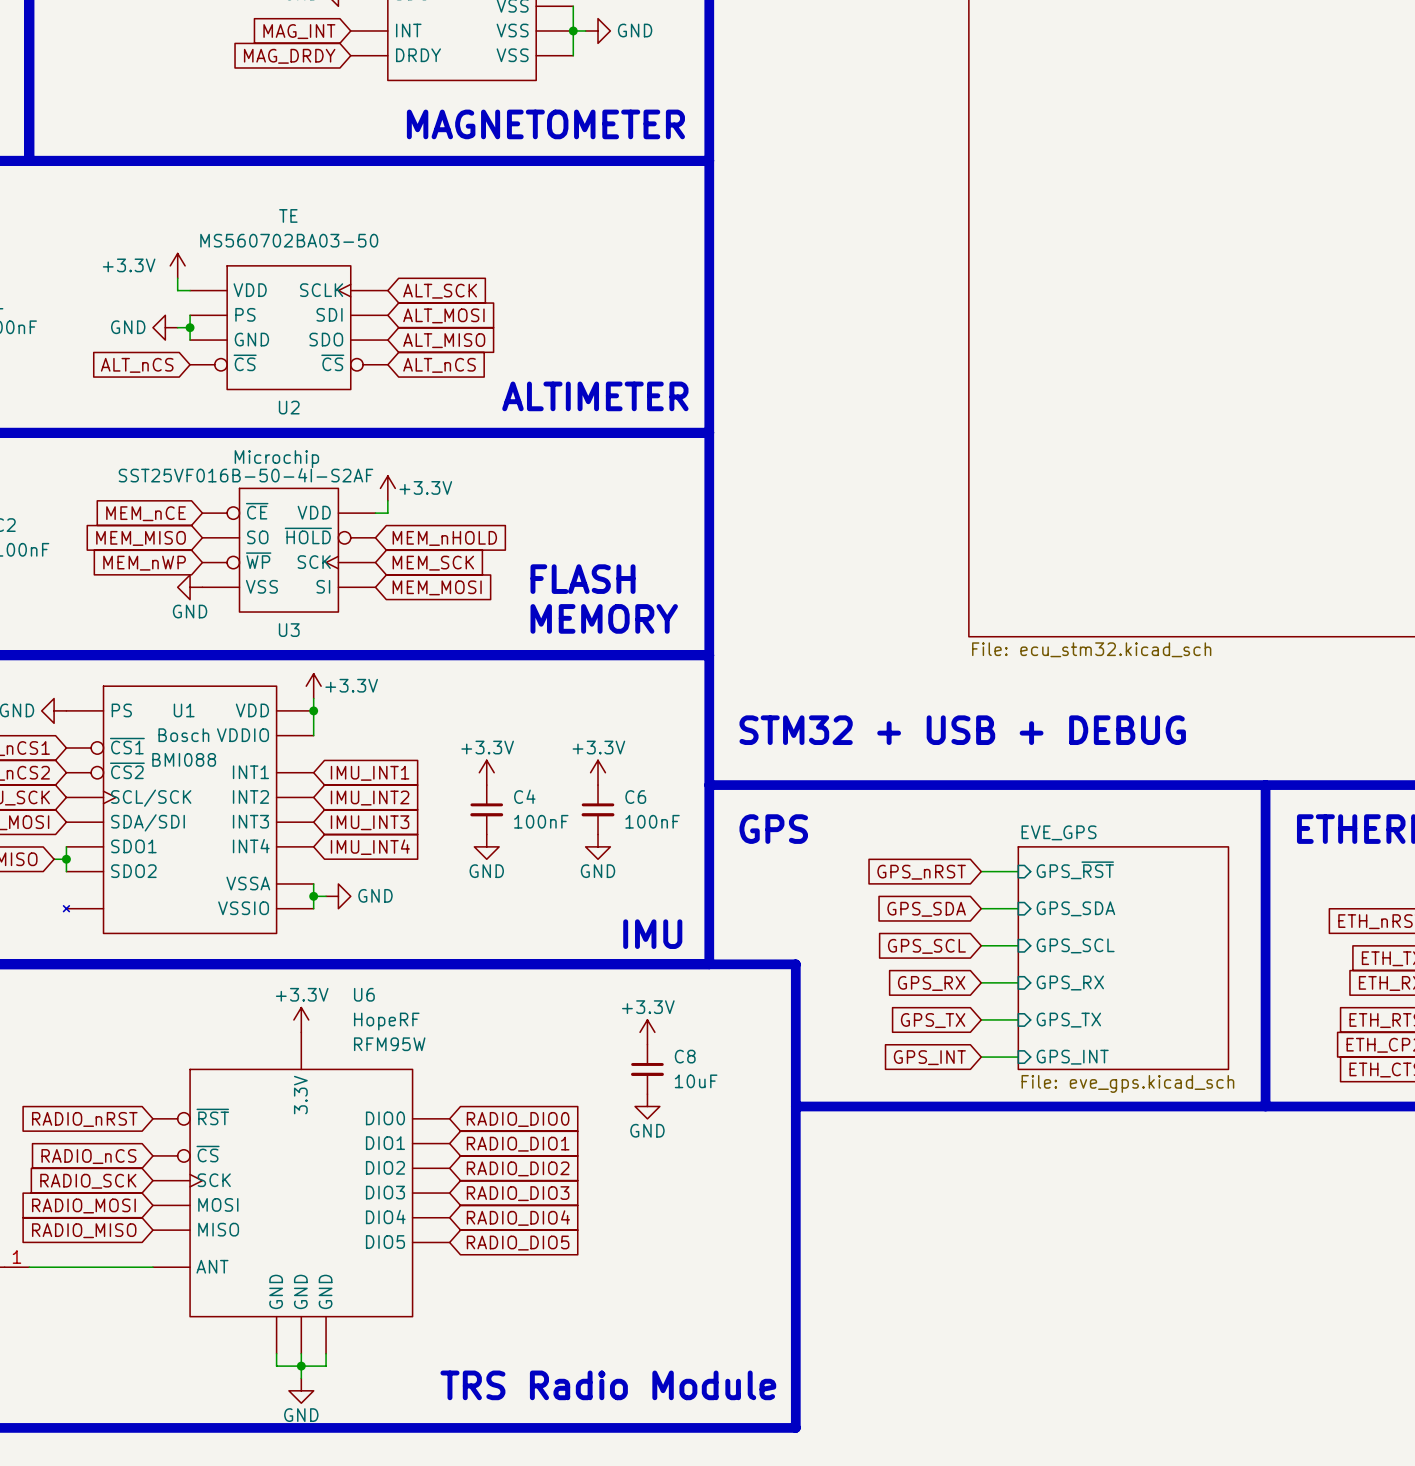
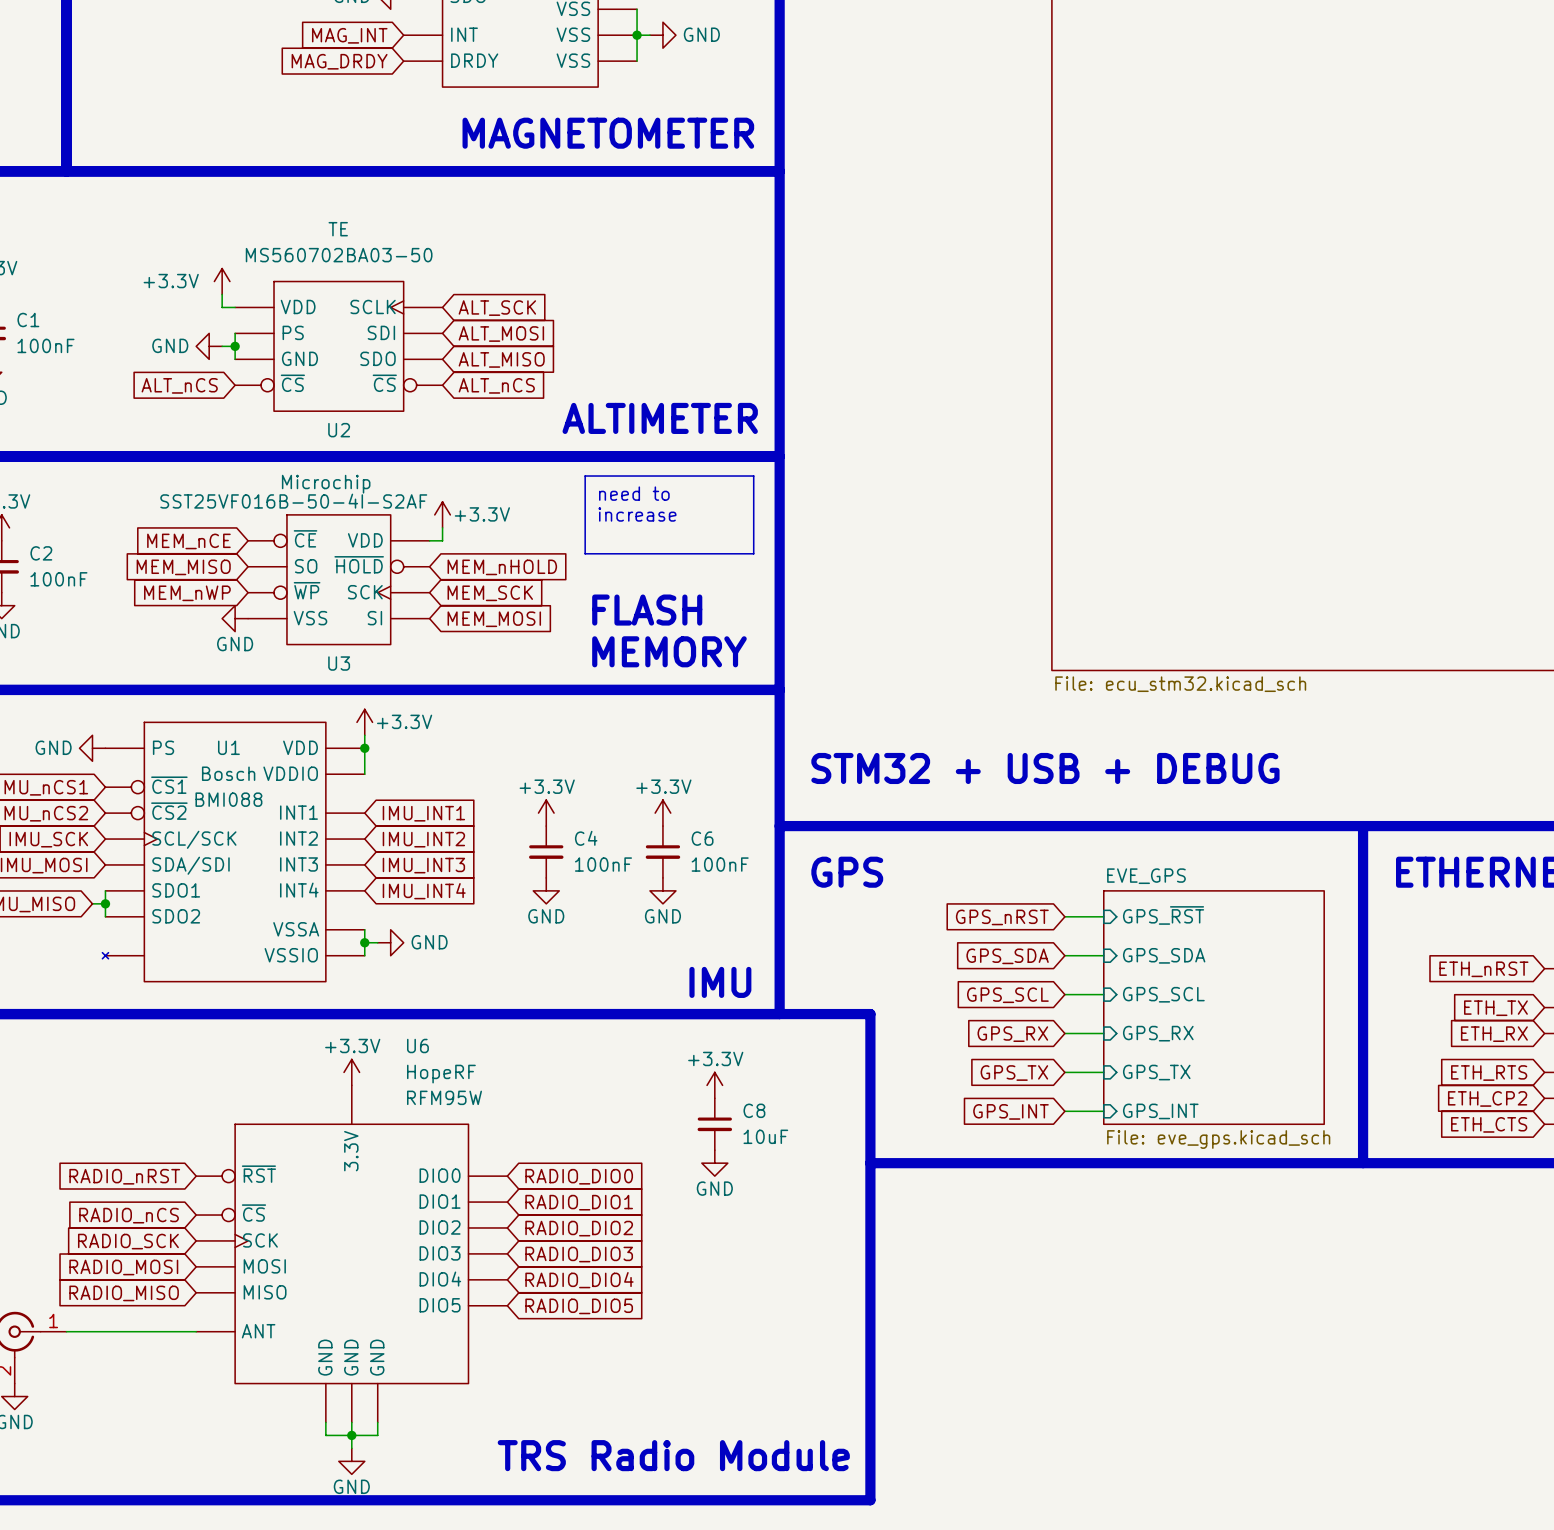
line: none -> (585, 476) (753, 476) (753, 553) (585, 553) (585, 476)
text: none -> need to (634, 493)
text: none -> increase (637, 514)

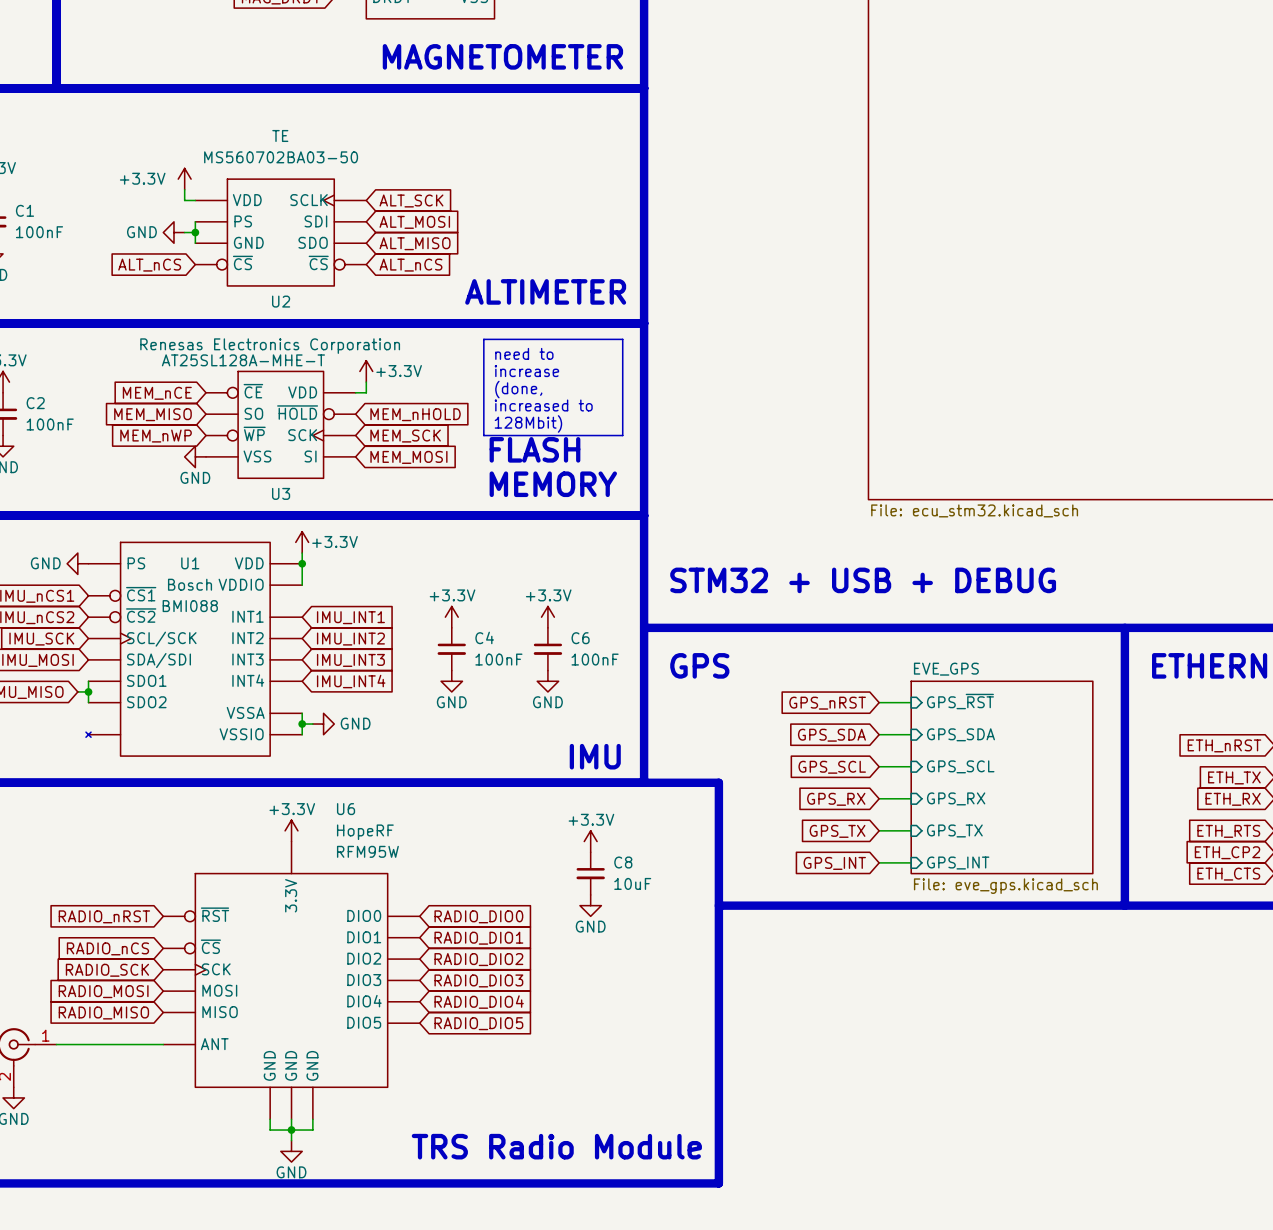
U3 text: Microchip (326, 484) -> Renesas Electronics Corporation (270, 346)
U3 text: SST25VF016B-50-4I-S2AF (293, 501) -> AT25SL128A-MHE-T (243, 360)
text: none -> (done, (518, 389)
line: (585, 553) (753, 553) -> (483, 403) (483, 435) (622, 435) (622, 403)
text: none -> increased to (543, 405)
text: none -> 128Mbit) (528, 423)

